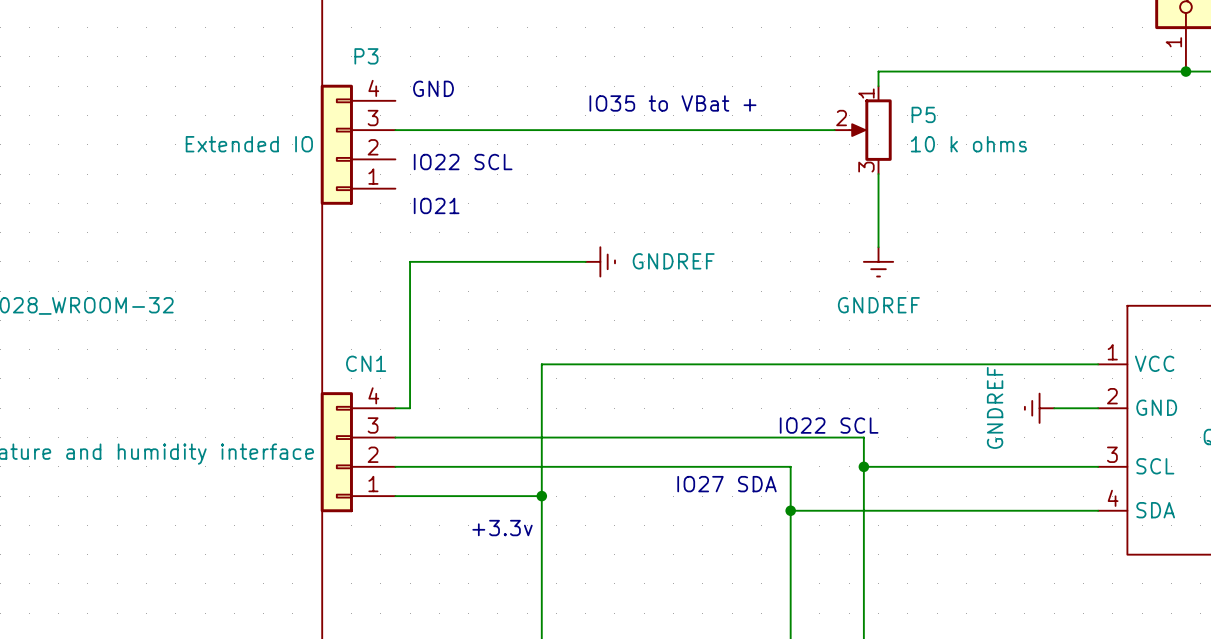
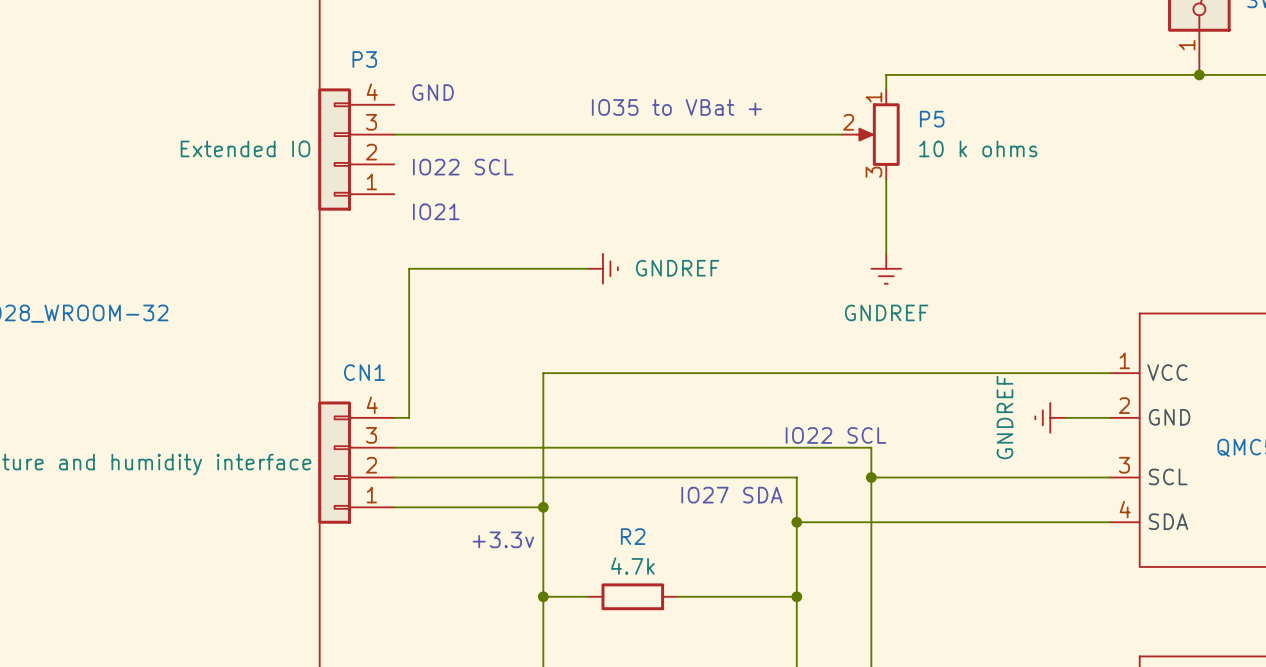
wire: none -> (543, 596) (588, 596)
junction: none -> (543, 596)
R2: none -> 4.7k (632, 596)
wire: none -> (677, 596) (796, 596)
junction: none -> (796, 596)

